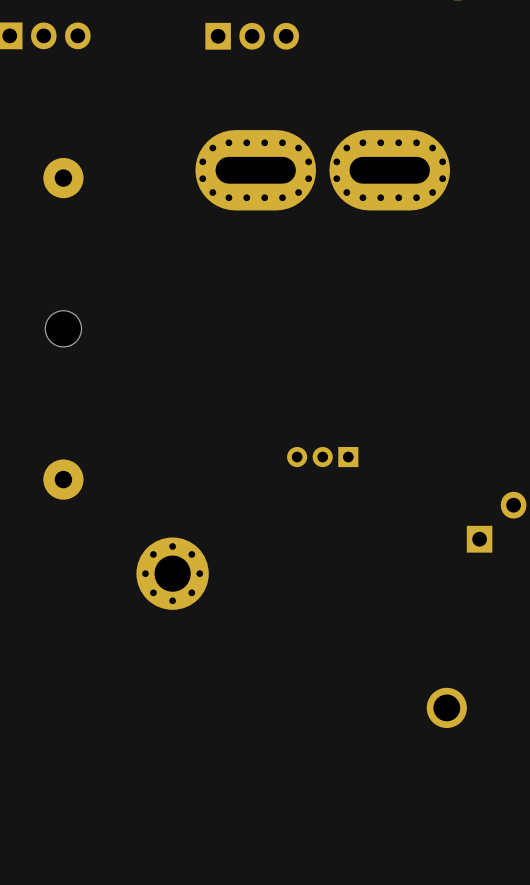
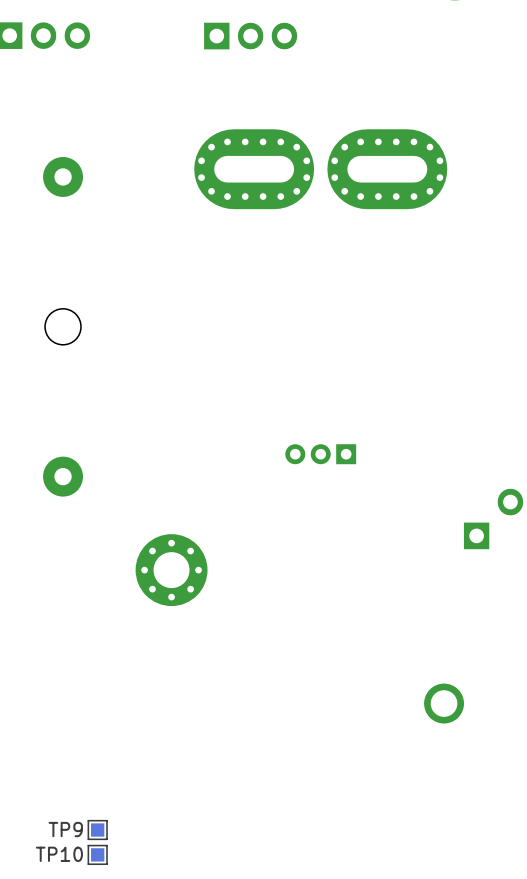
TP9: none -> (97, 830)
TP10: none -> (97, 854)

